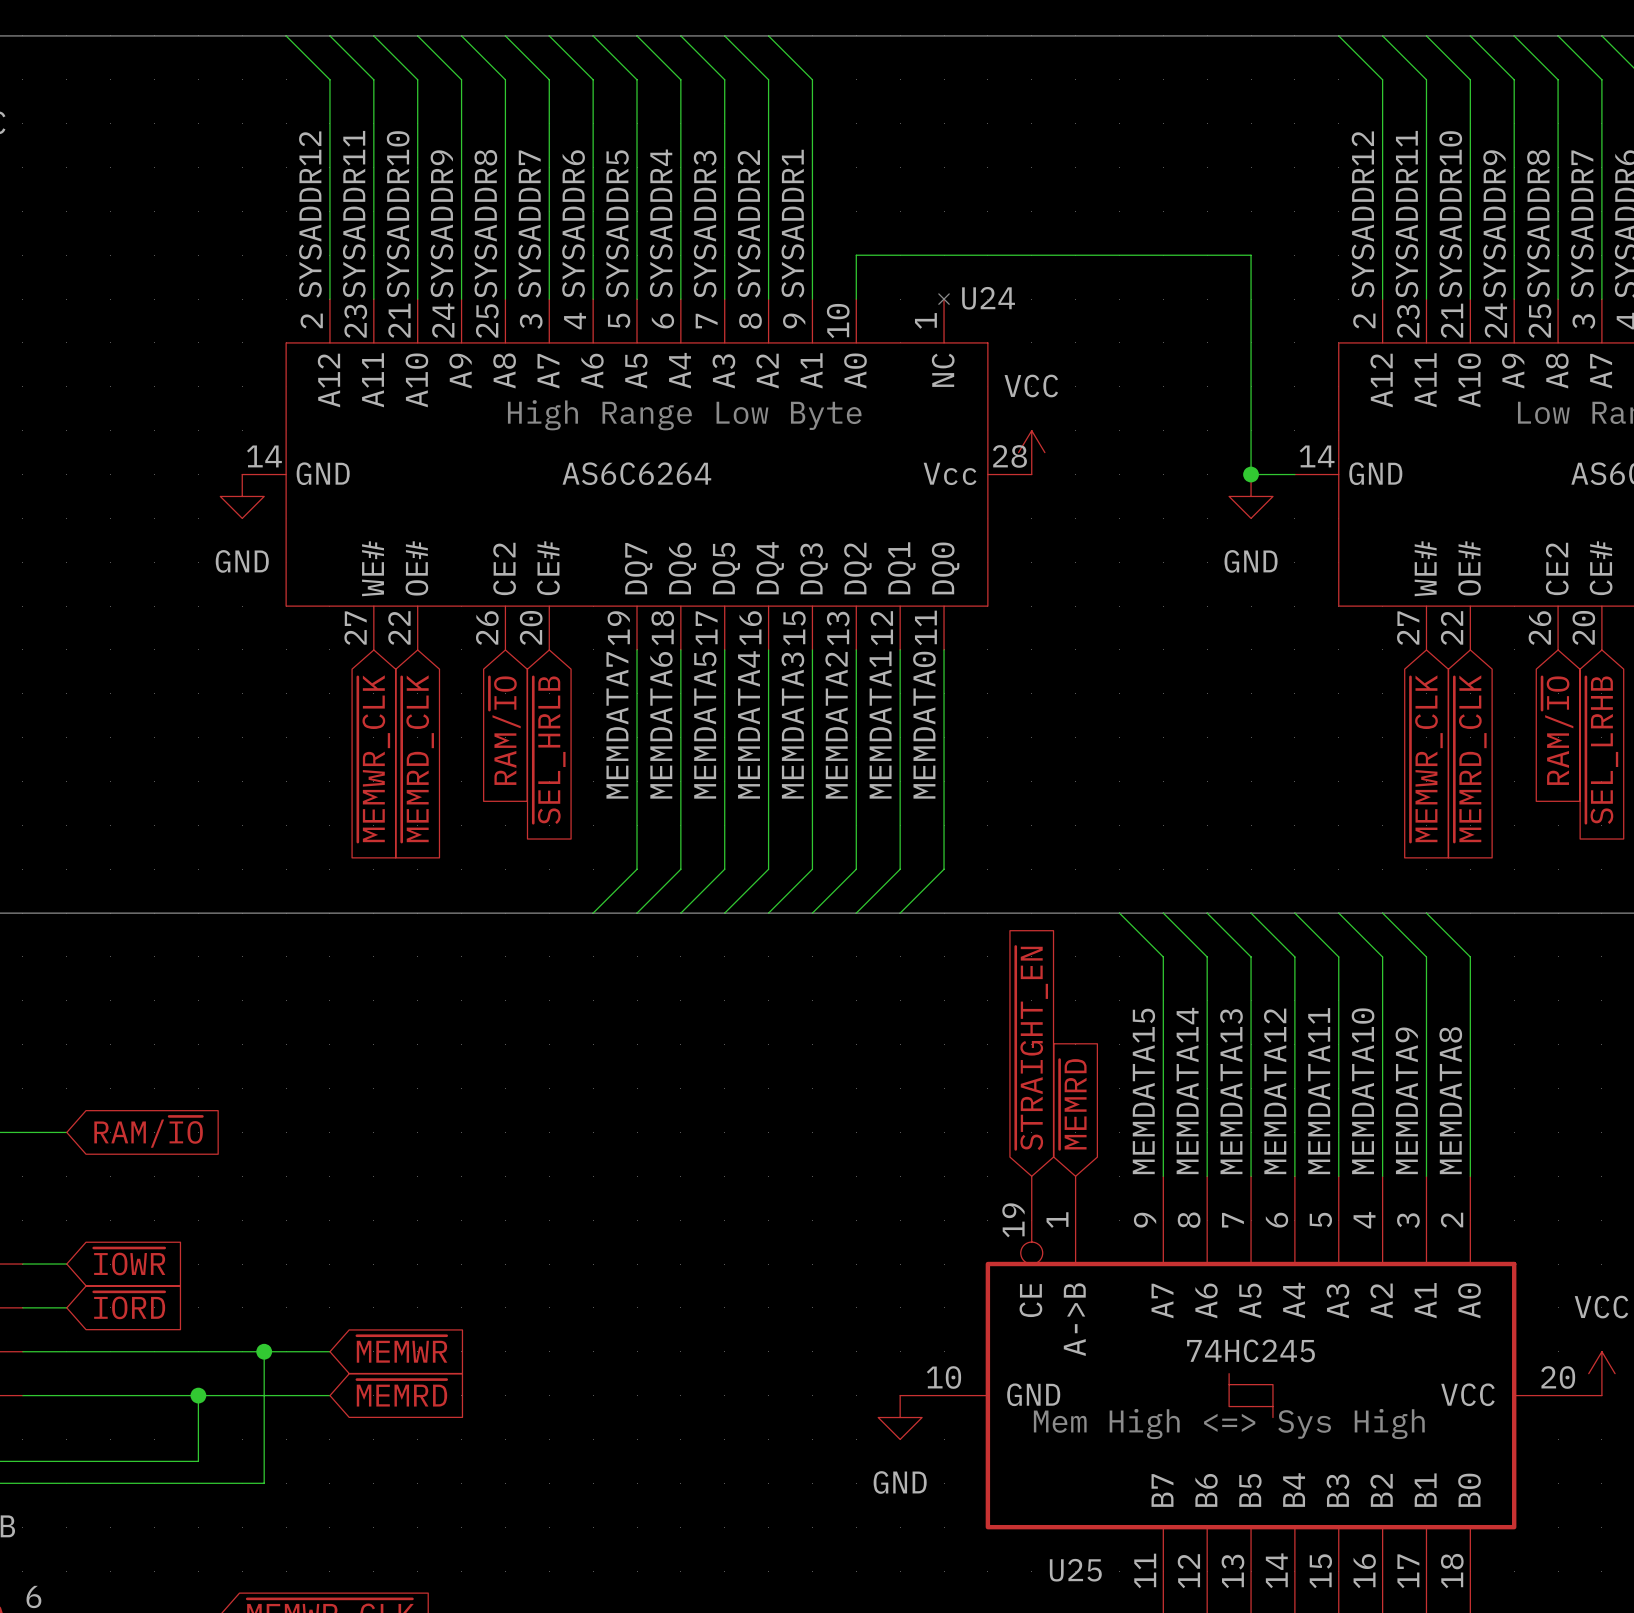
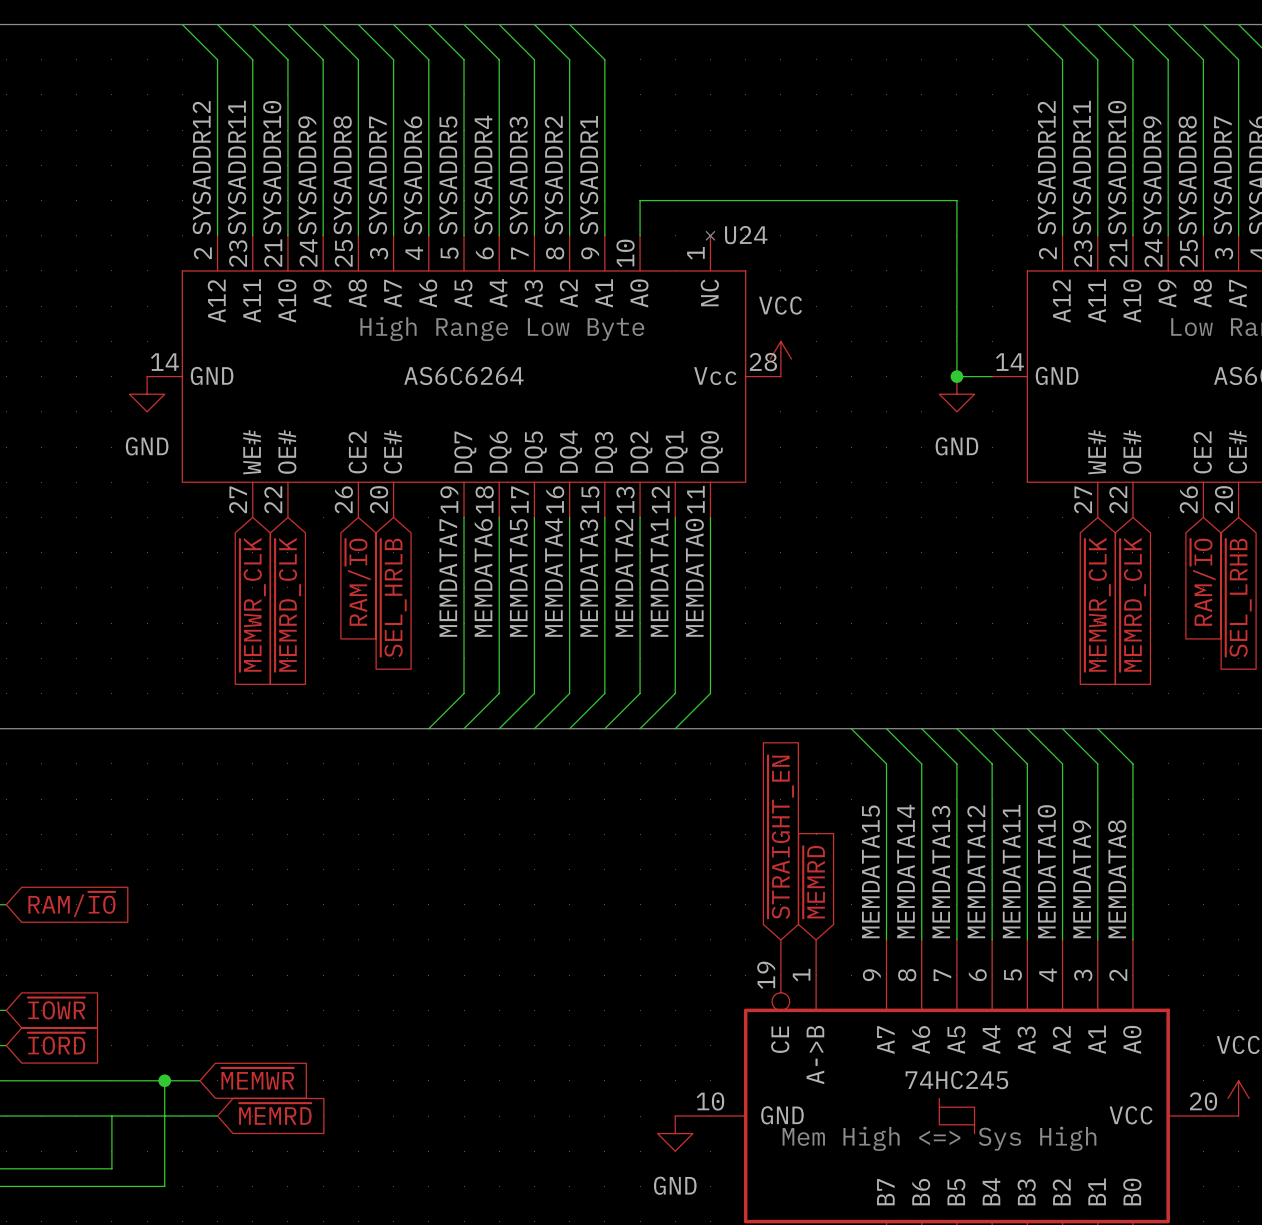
global label position: ~{MEMWR} (402, 1349) -> ~{MEMWR} (257, 1078)
wire: (308, 1351) (329, 1351) -> none
junction: (198, 1395) -> none

